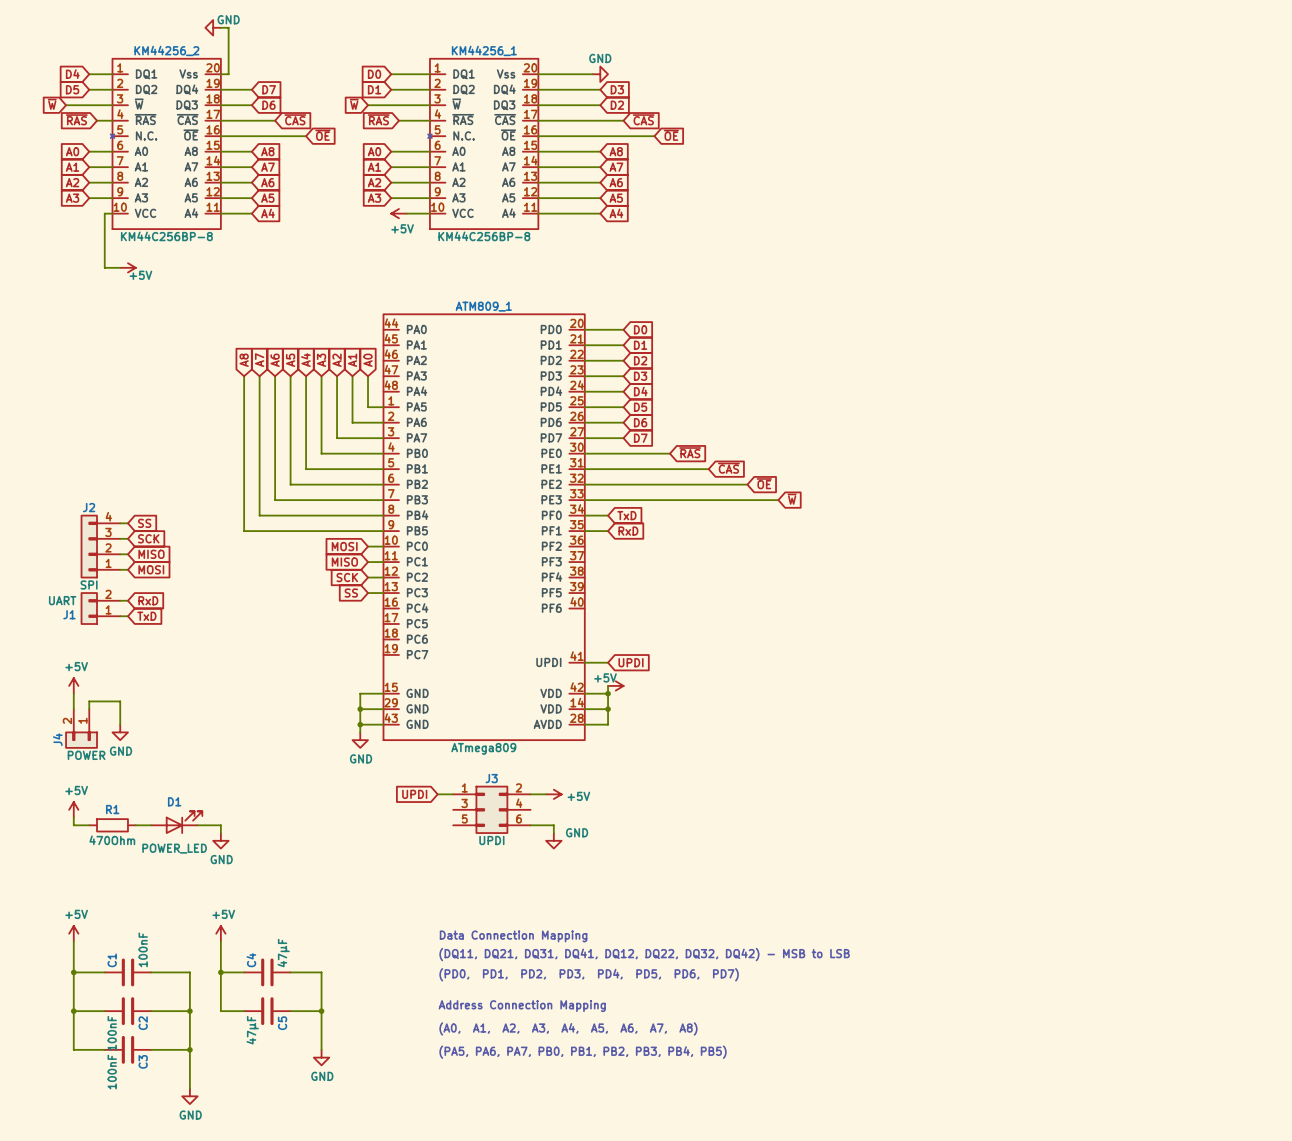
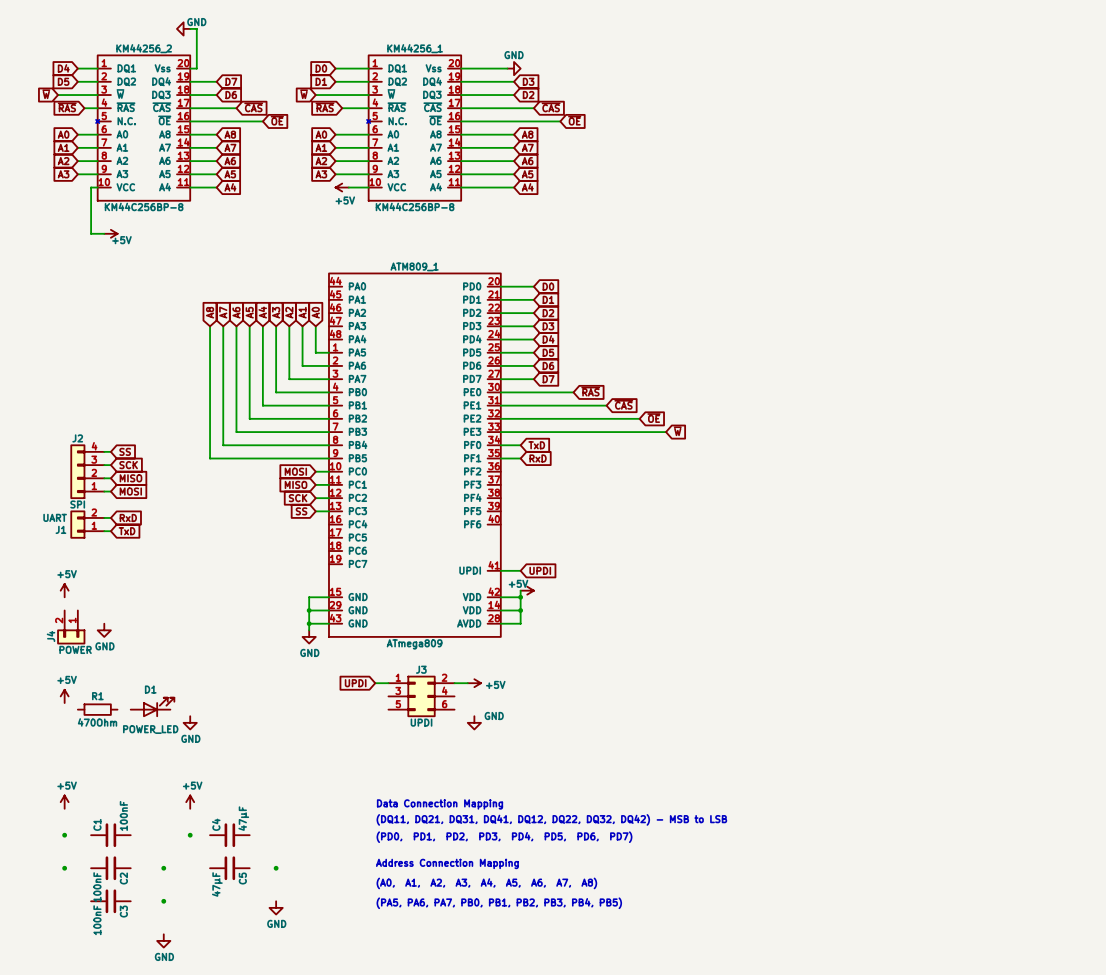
wire: (73, 693) (73, 709) -> none
wire: (89, 709) (89, 701) (120, 701) (120, 724) -> none
wire: (73, 817) (73, 825) (89, 825) -> none
wire: (135, 825) (151, 825) -> none
wire: (197, 825) (220, 825) (220, 833) -> none
wire: (530, 825) (553, 825) (553, 833) -> none
wire: (73, 941) (73, 1049) (104, 1049) -> none
wire: (220, 941) (220, 1011) (244, 1011) -> none
wire: (73, 972) (104, 972) -> none
wire: (151, 972) (189, 972) (189, 1088) -> none
wire: (220, 972) (244, 972) -> none
wire: (290, 972) (321, 972) (321, 1049) -> none
wire: (73, 1011) (104, 1011) -> none
wire: (151, 1011) (189, 1011) -> none
wire: (290, 1011) (321, 1011) -> none
wire: (151, 1049) (189, 1049) -> none

